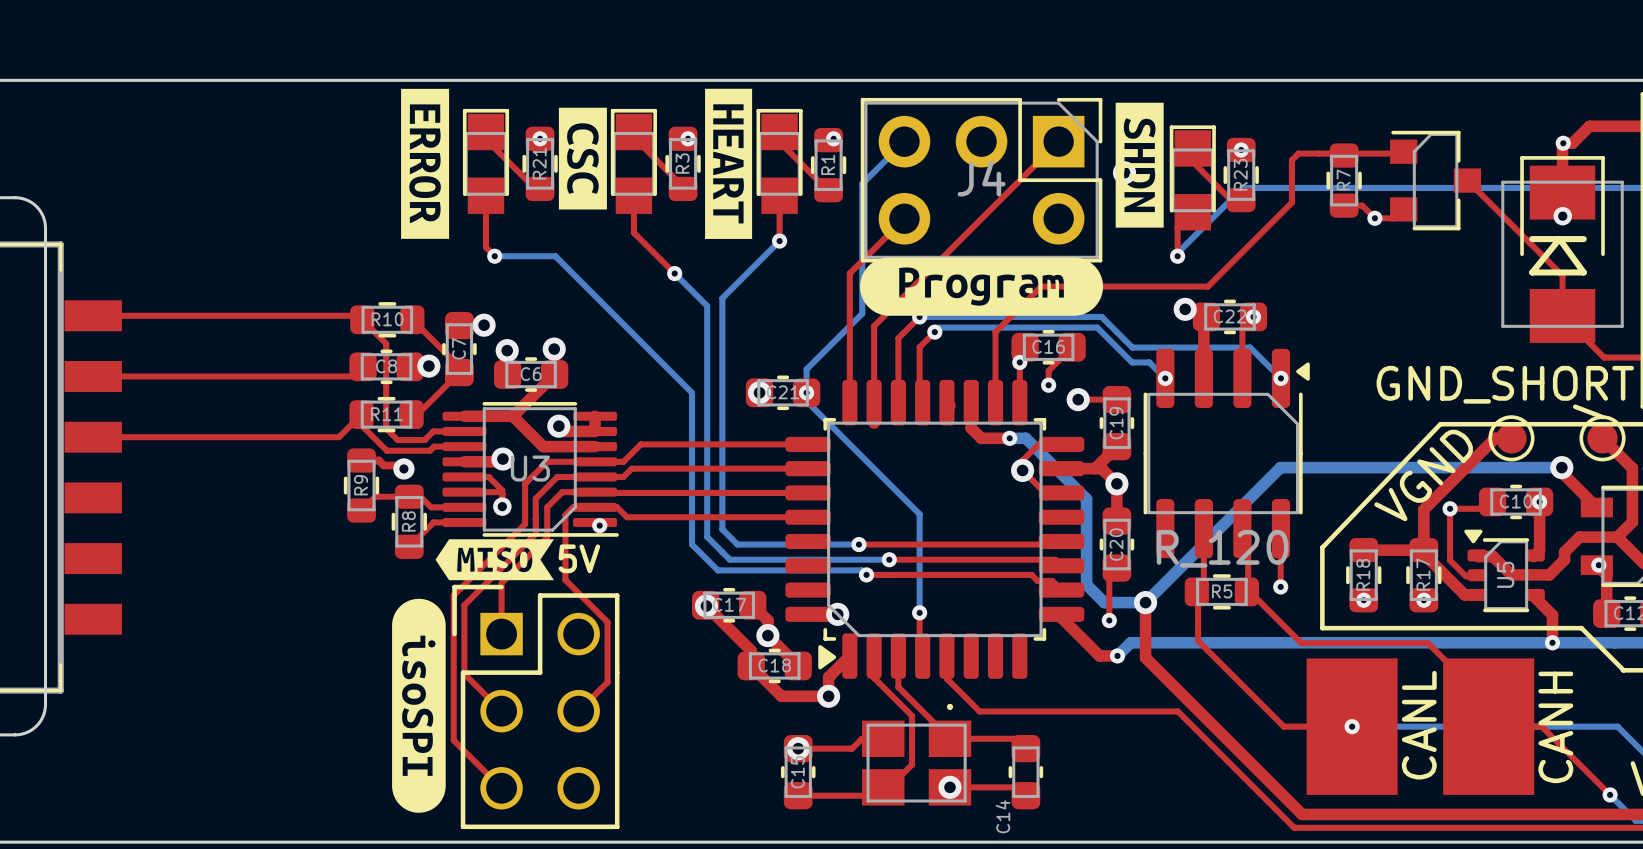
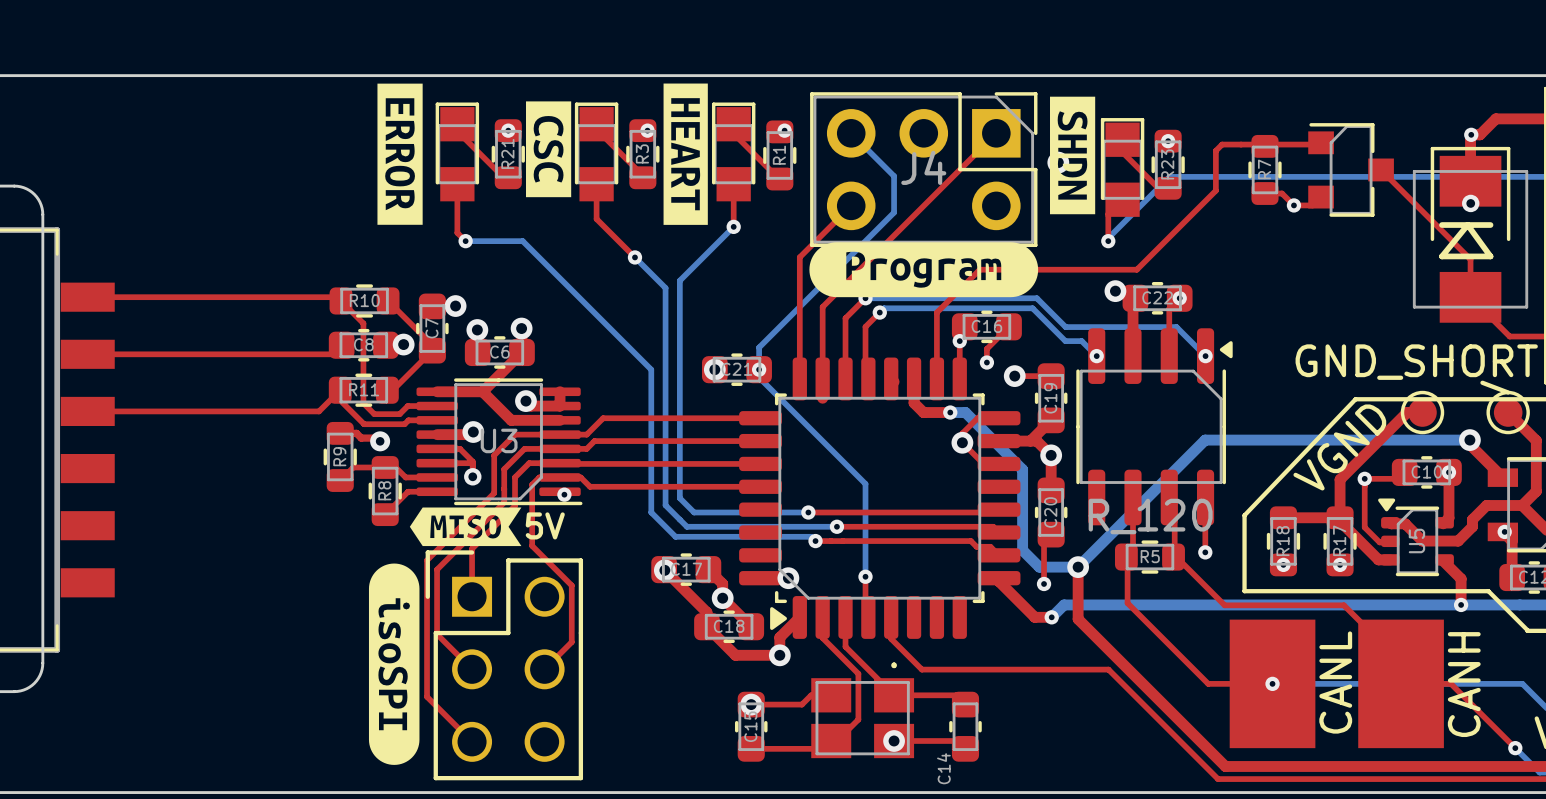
bottom track: (904, 141) (862, 183) (862, 313) -> (851, 133) (894, 176) (894, 212) (811, 295)

